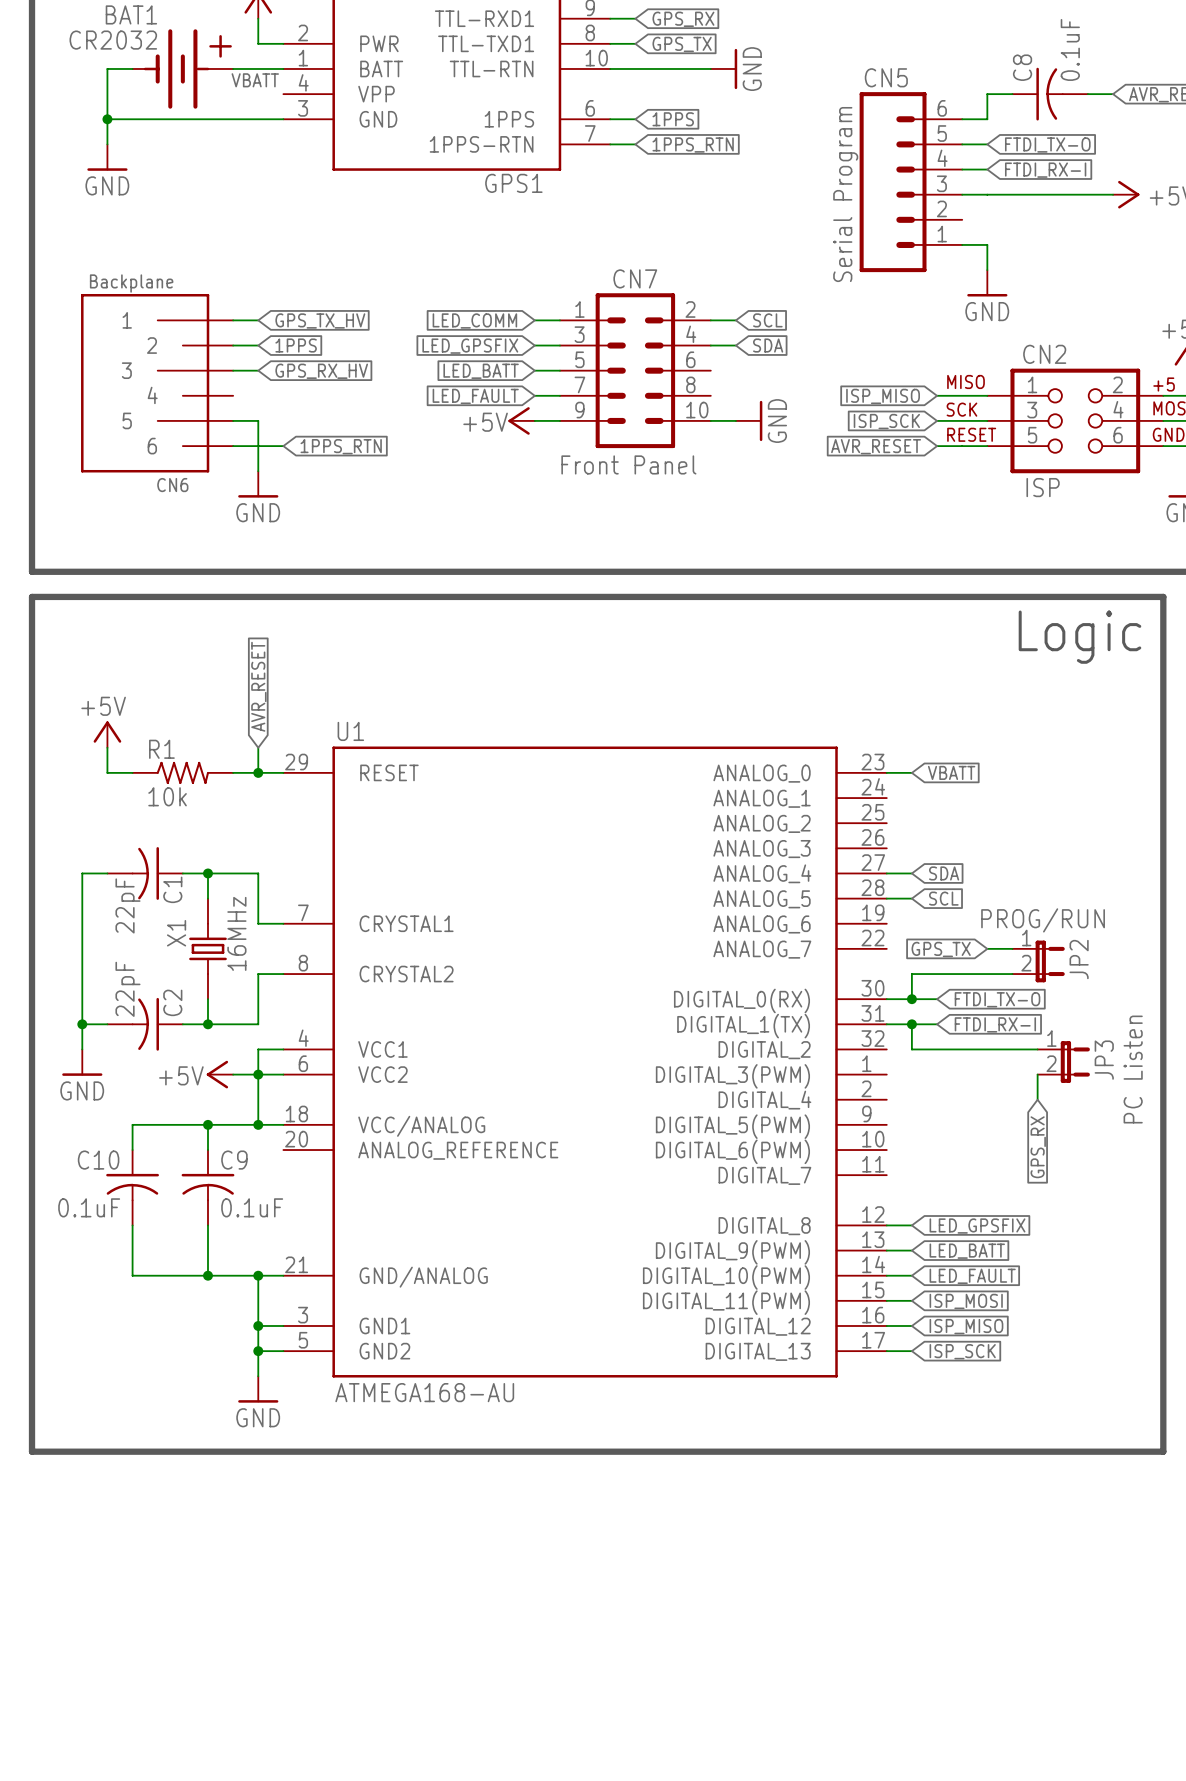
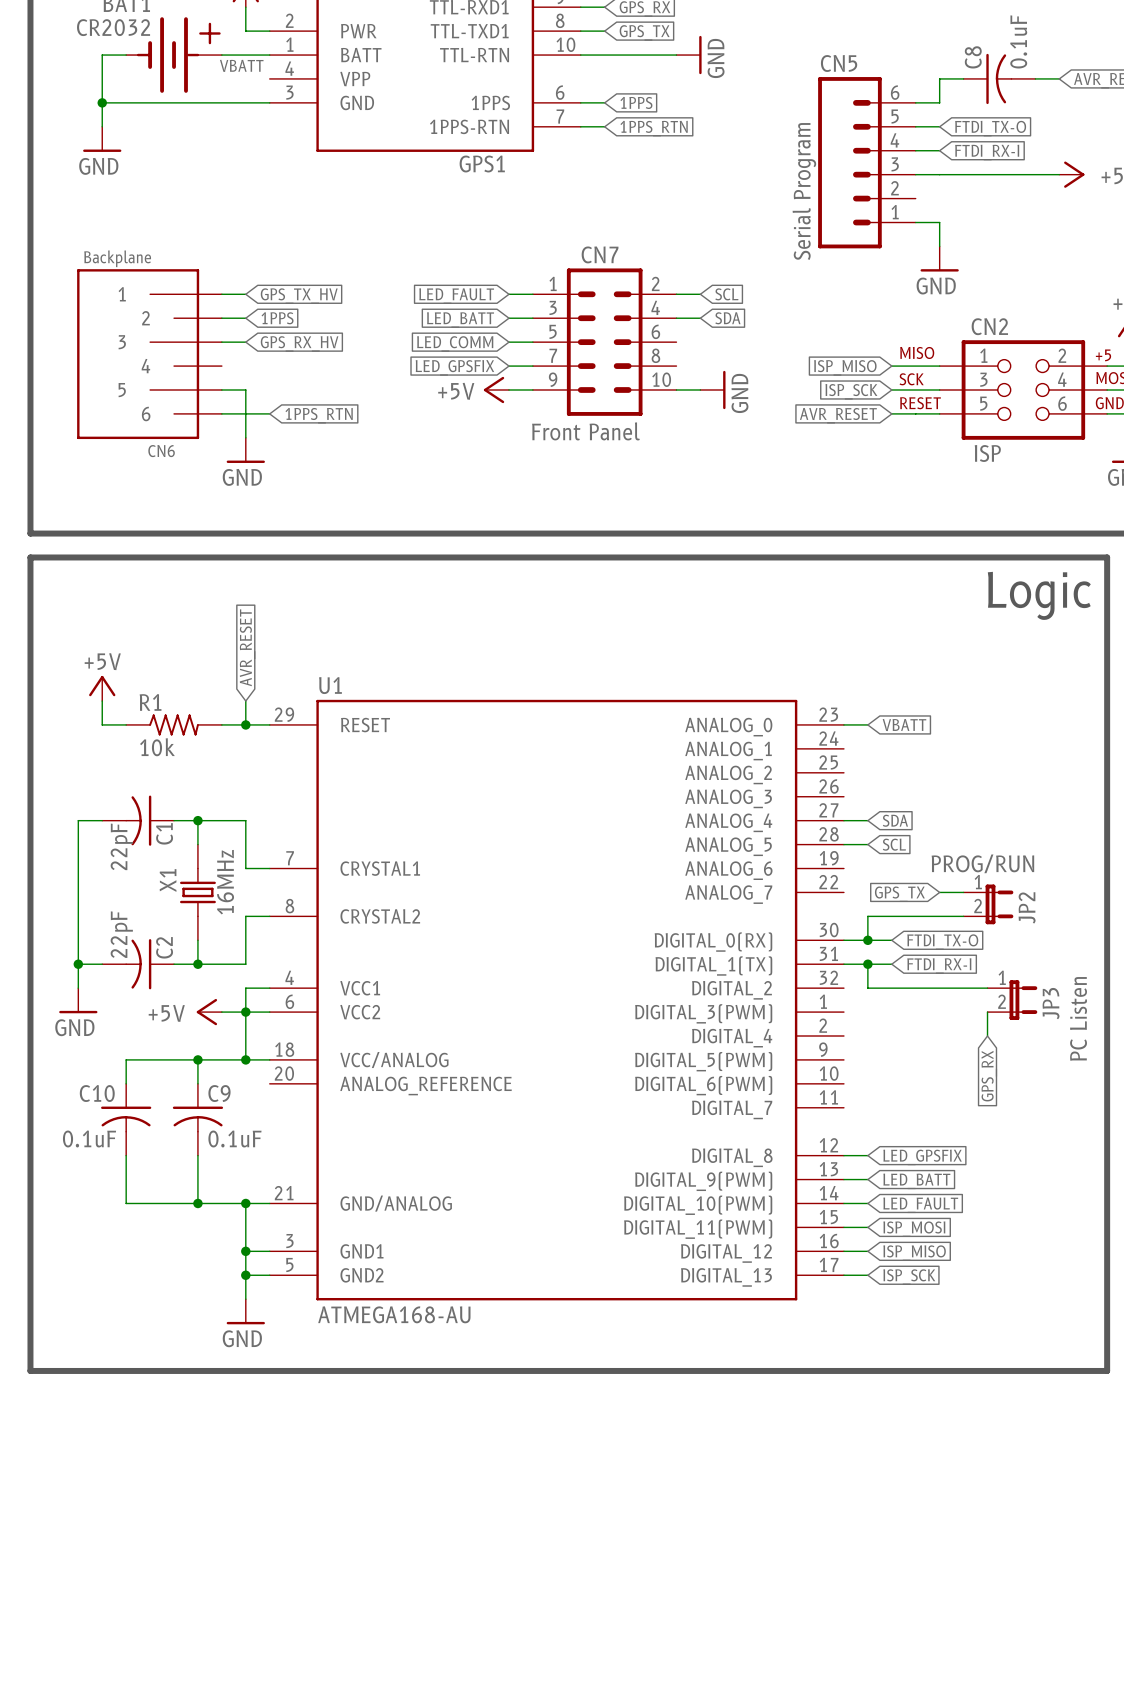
global label: LED_COMM (474, 320) -> LED_FAULT (456, 296)
global label: LED_GPSFIX (470, 346) -> LED_BATT (460, 320)
global label: LED_BATT (481, 371) -> LED_COMM (455, 343)
global label: LED_FAULT (475, 396) -> LED_GPSFIX (454, 367)

